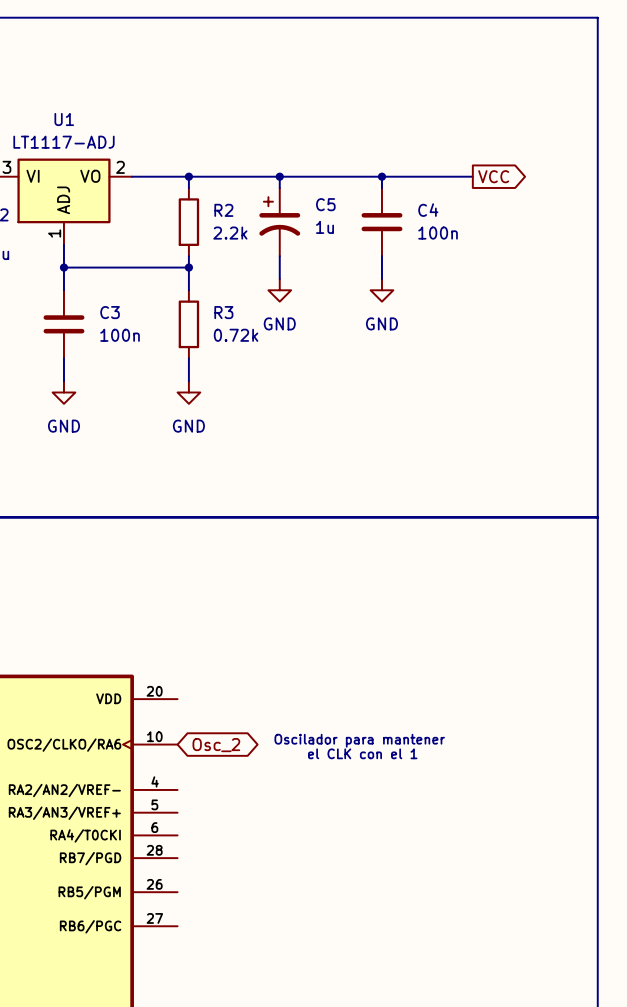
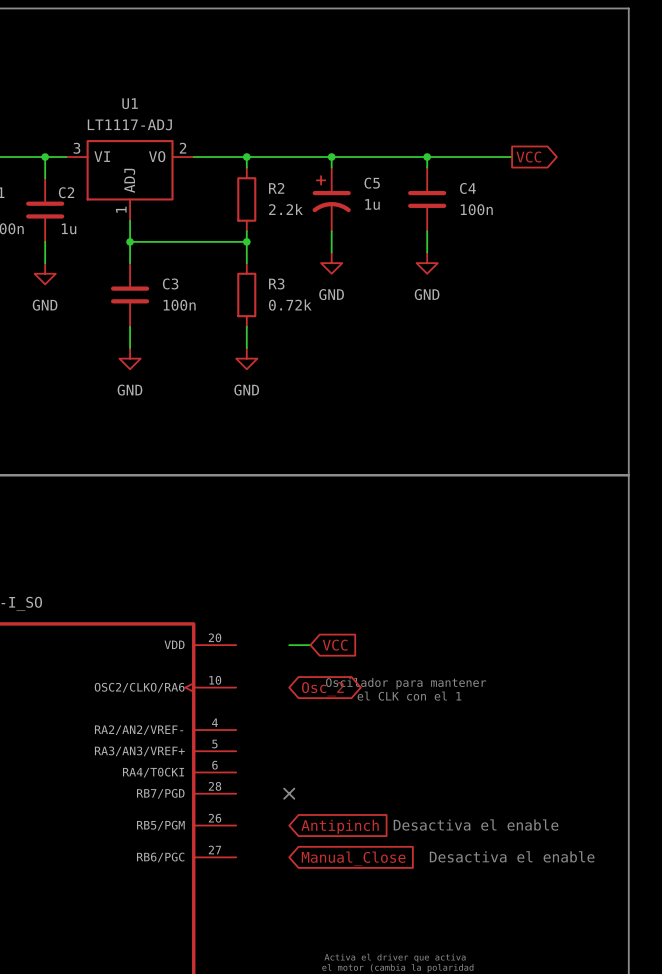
wire: none -> (289, 645) (310, 645)
global label: none -> VCC (335, 645)
global label position: Osc_2 (216, 745) -> Osc_2 (322, 689)
no-connect mark: none -> (289, 793)
text: none -> Desactiva el enable (476, 825)
global label: none -> Antipinch (340, 826)
text: none -> Desactiva el enable (512, 856)
global label: none -> Manual_Close (353, 858)

